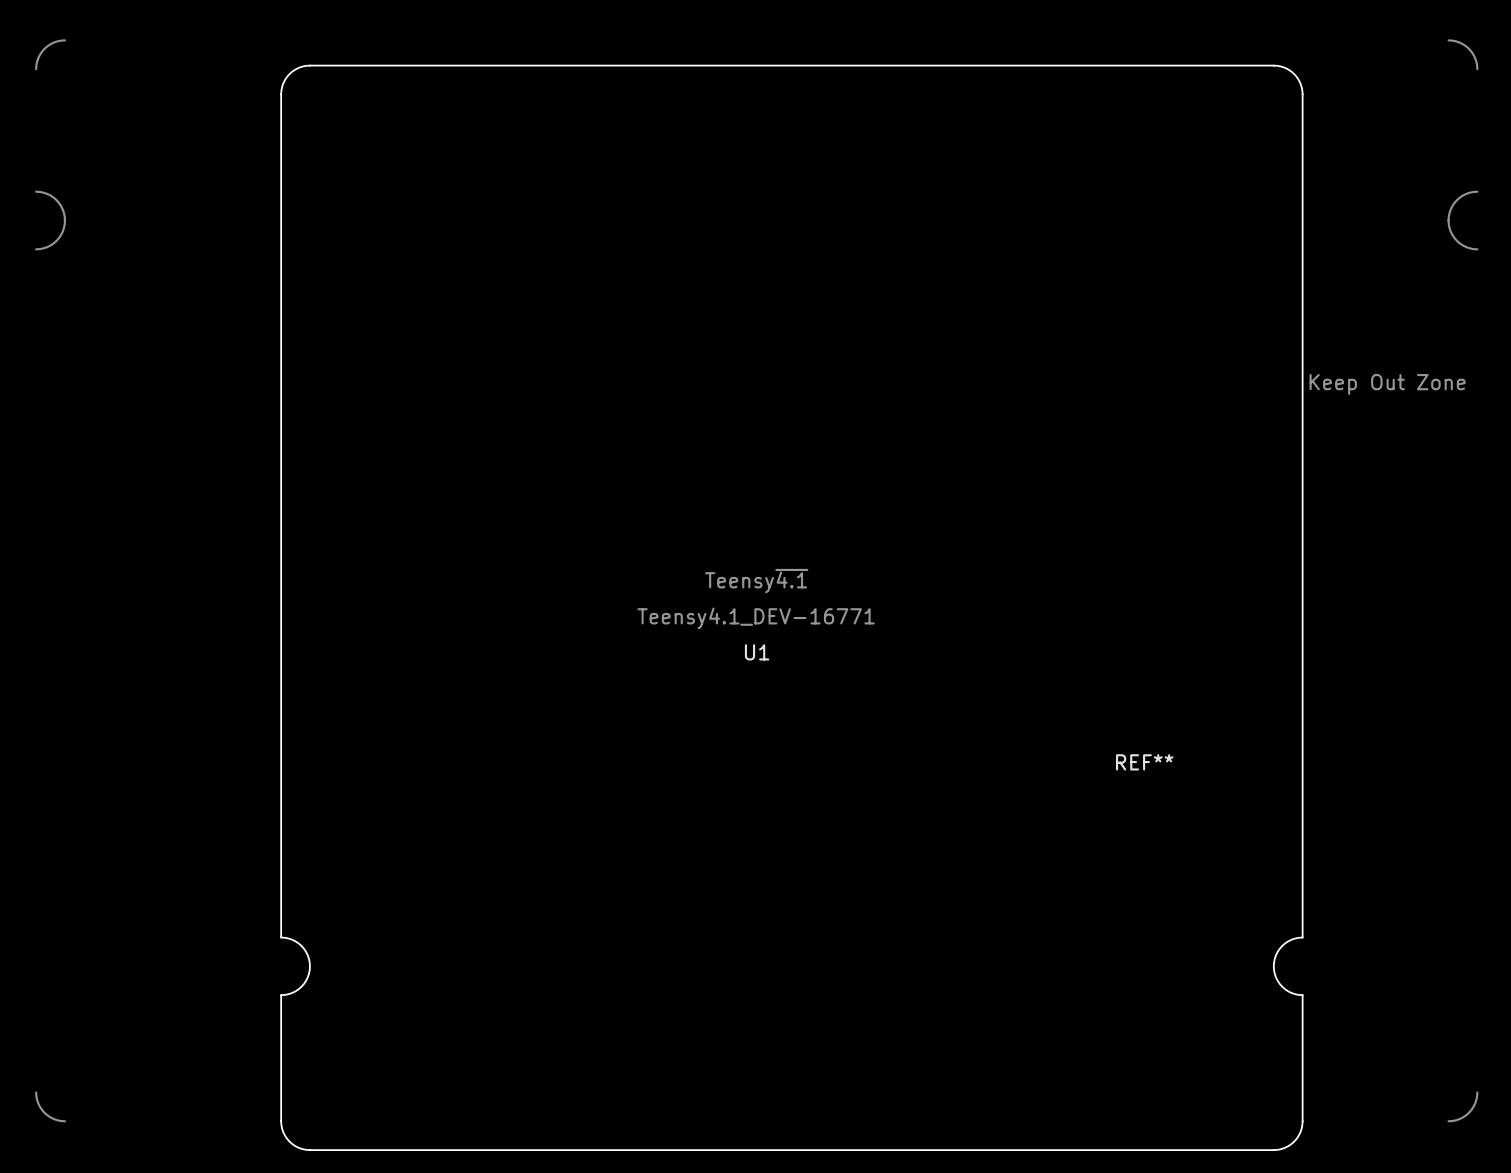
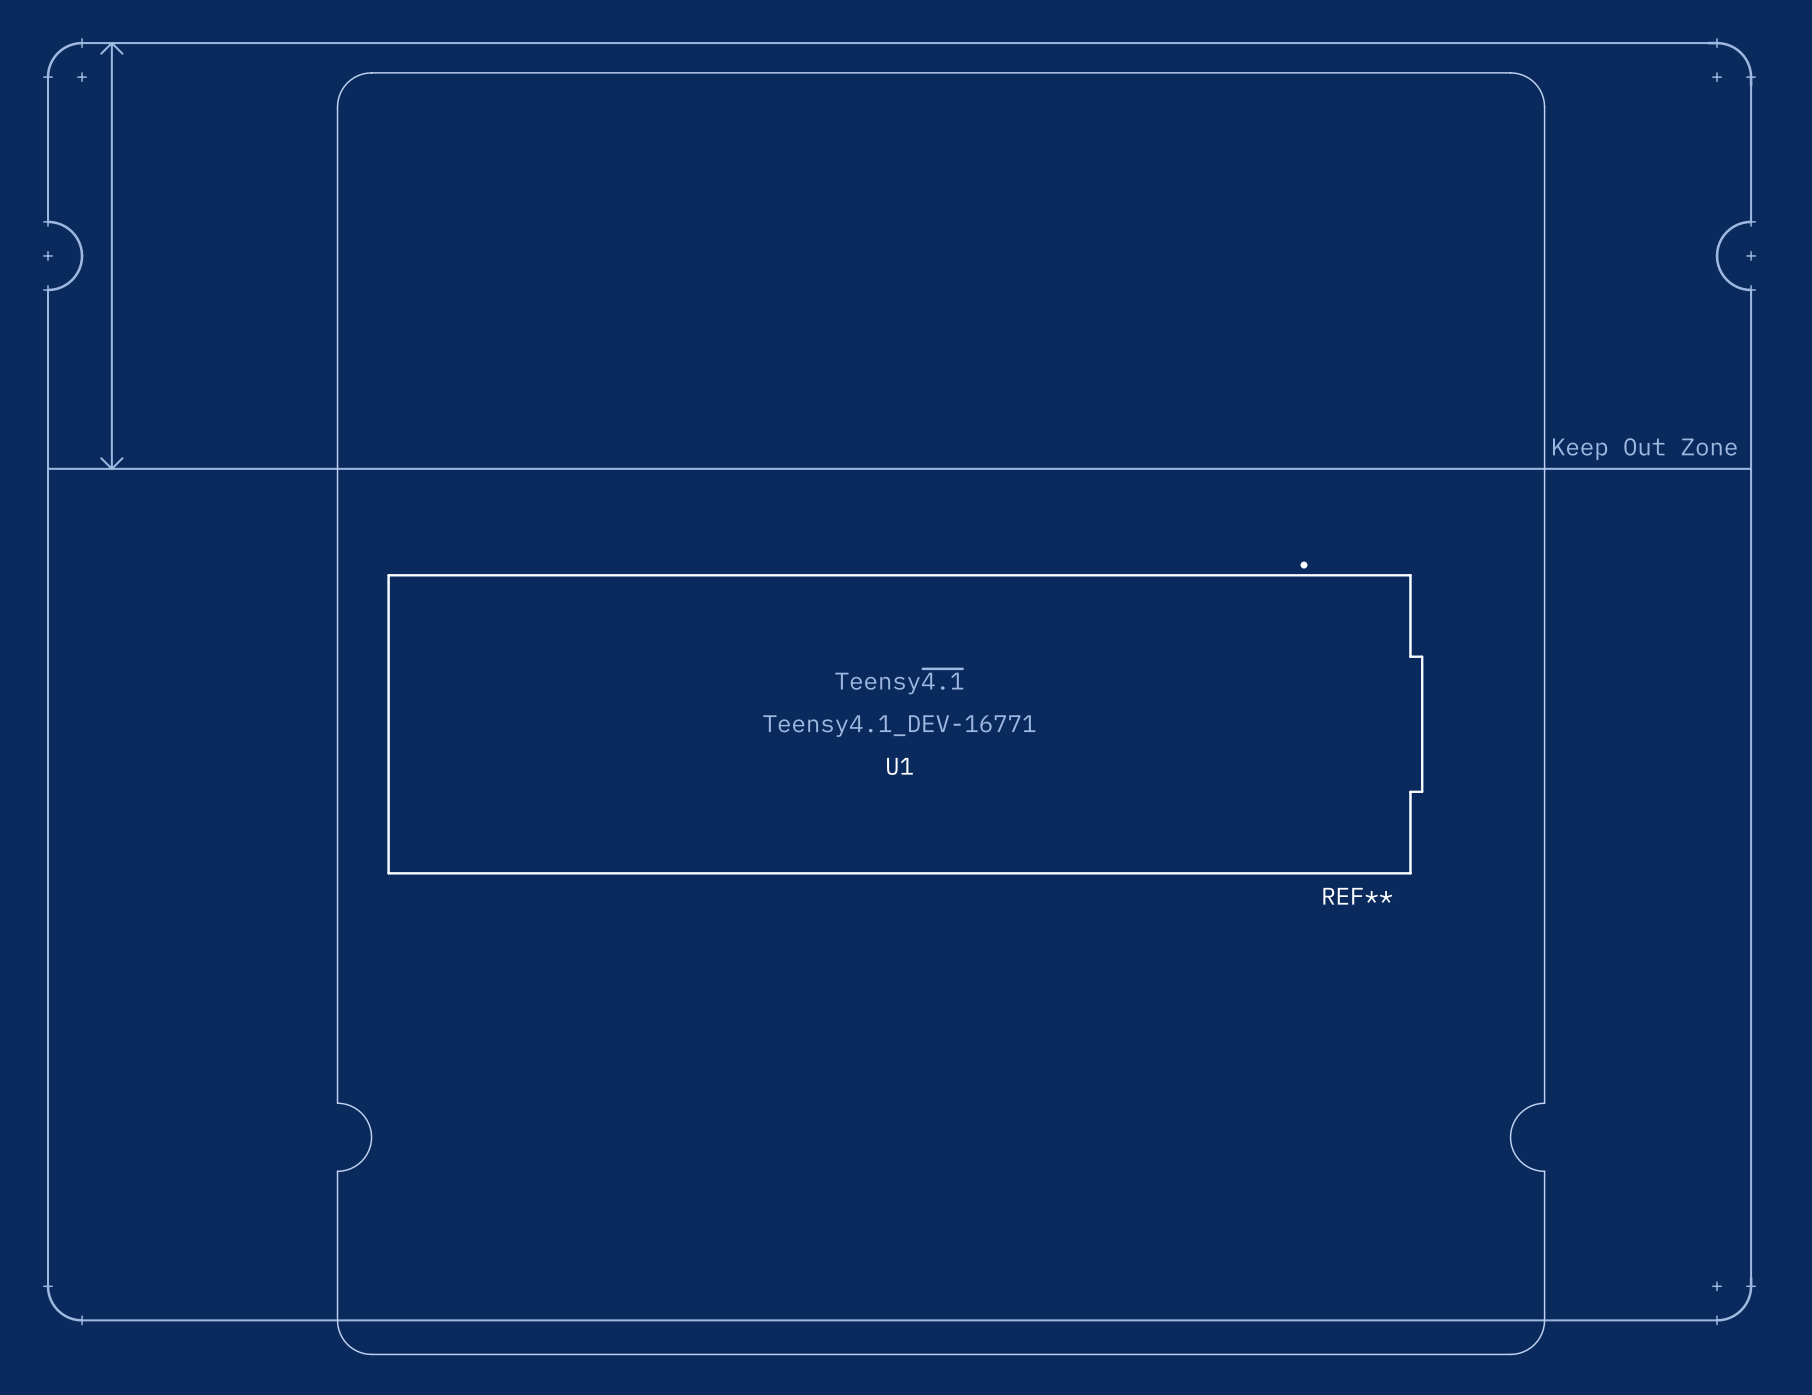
U1 footprint: [35, 39, 1479, 1123] -> [43, 38, 1756, 1326]

